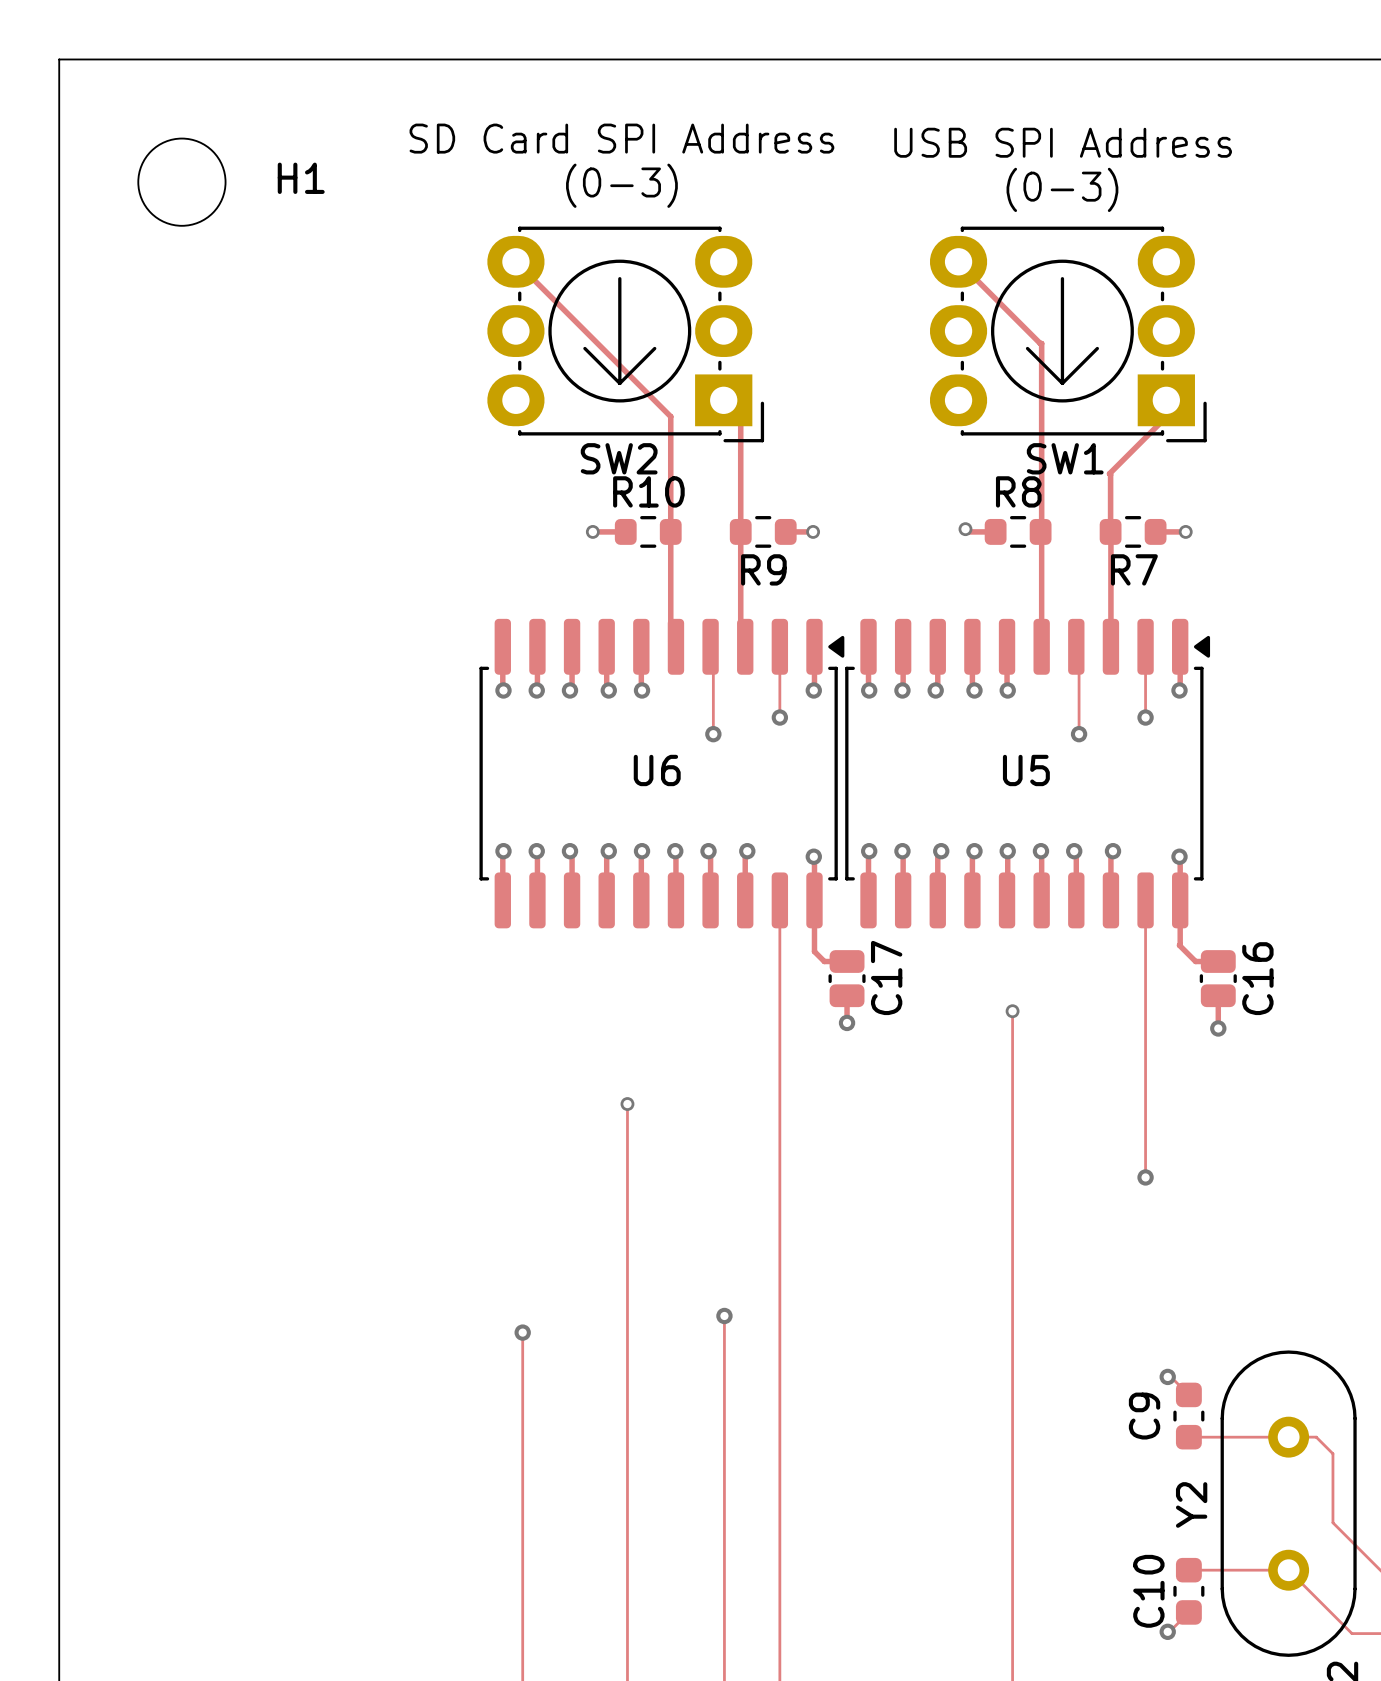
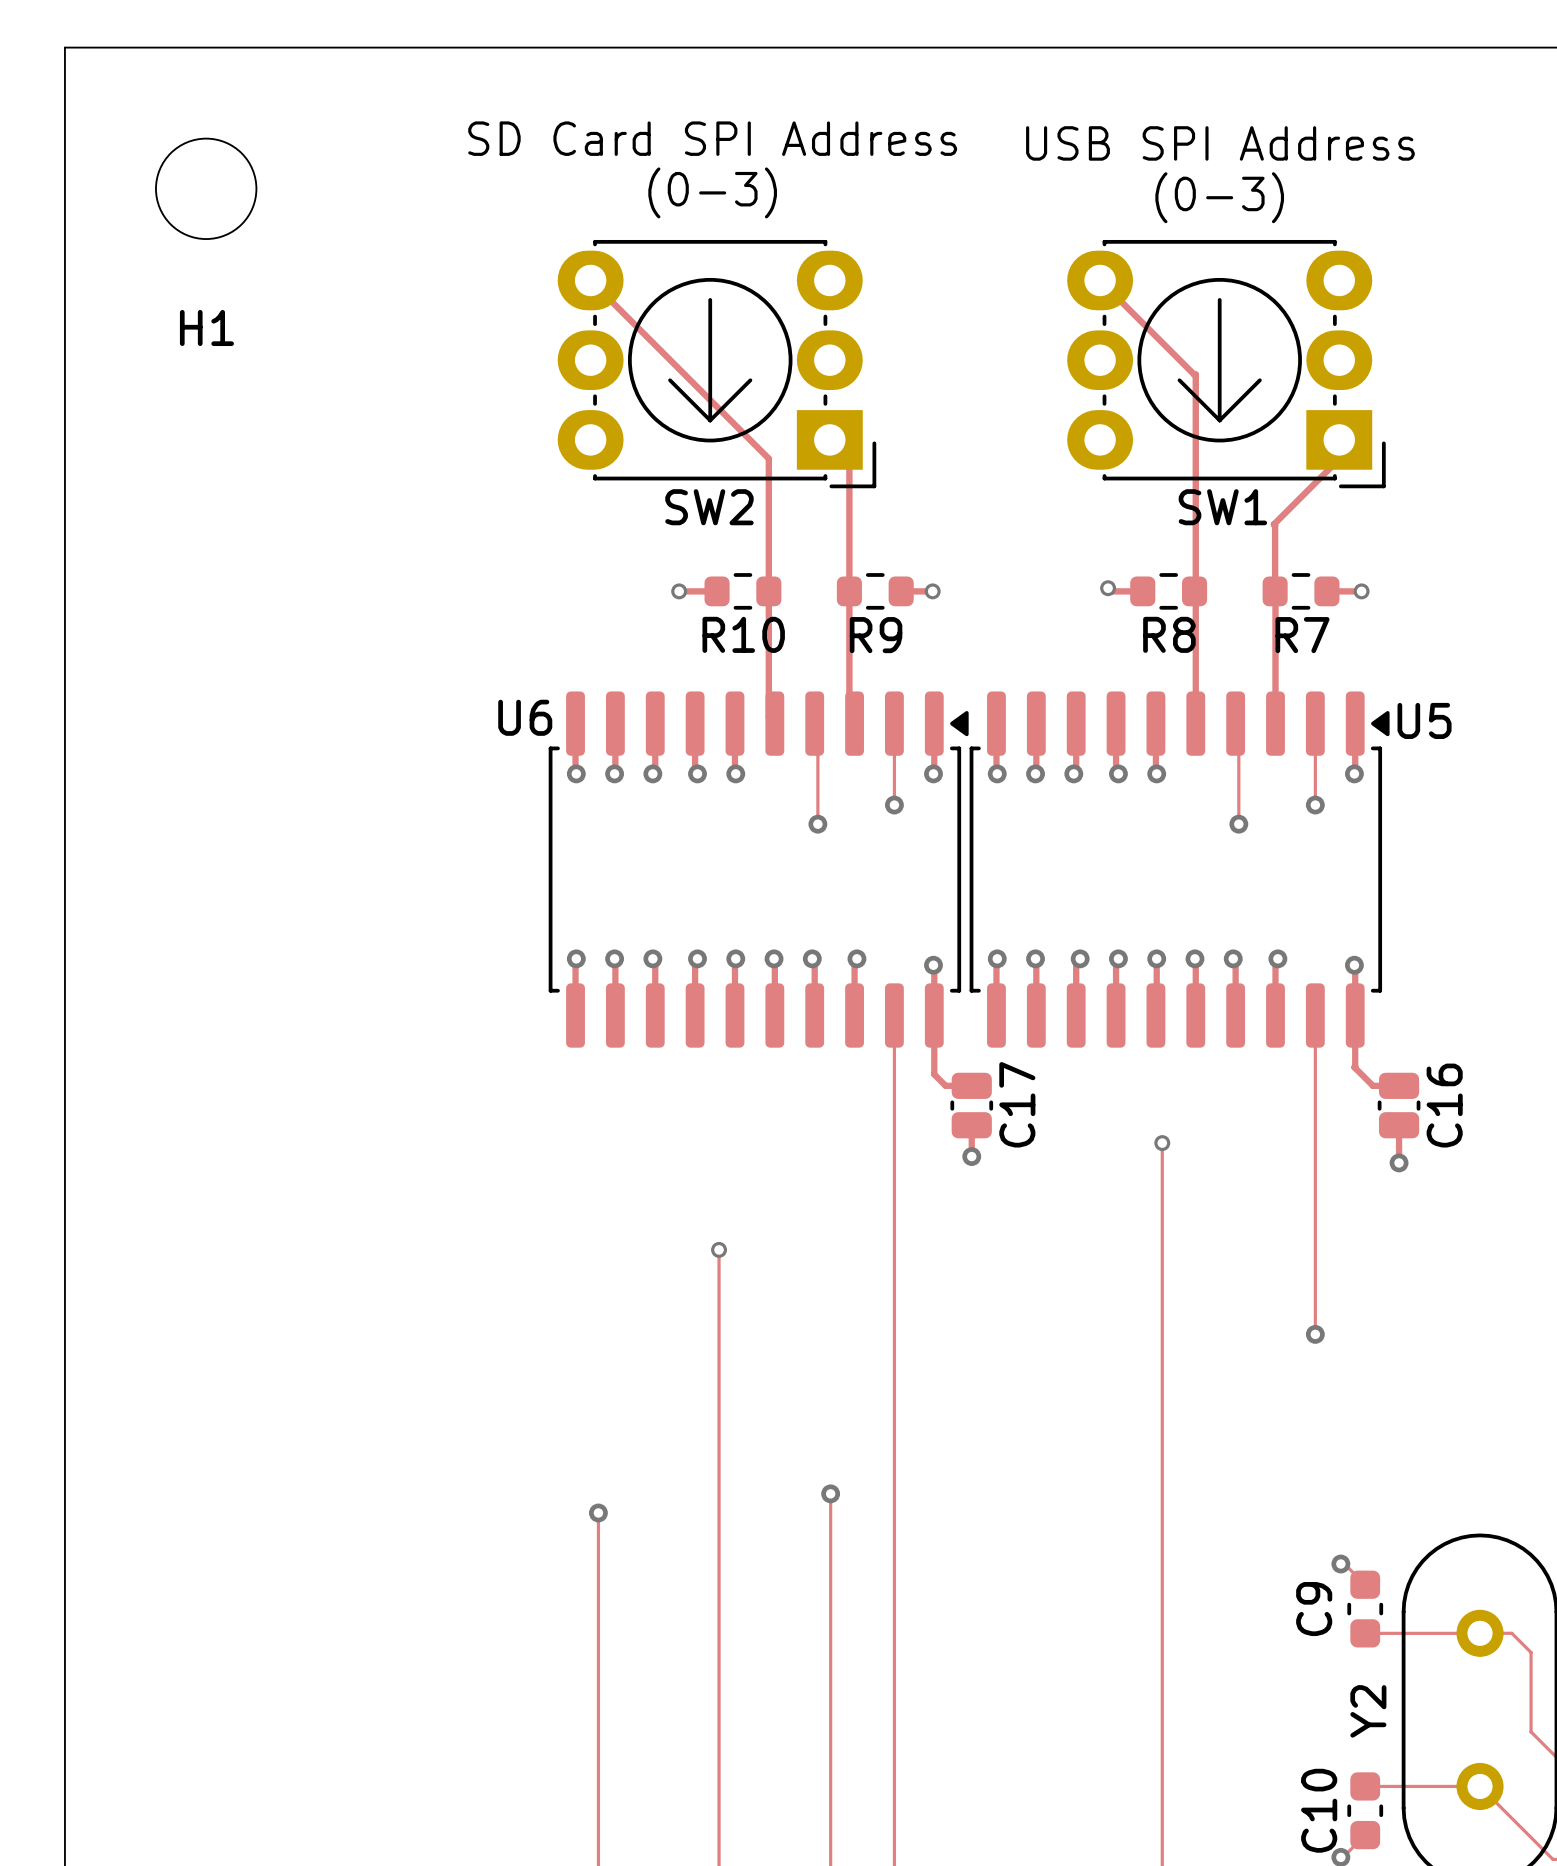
H1 name position: H1 (301, 178) -> H1 (206, 327)
R10 name position: R10 (648, 491) -> R10 (743, 634)
R8 name position: R8 (1018, 491) -> R8 (1169, 634)
U6 name position: U6 (657, 770) -> U6 (525, 717)
U5 name position: U5 (1026, 770) -> U5 (1424, 720)

